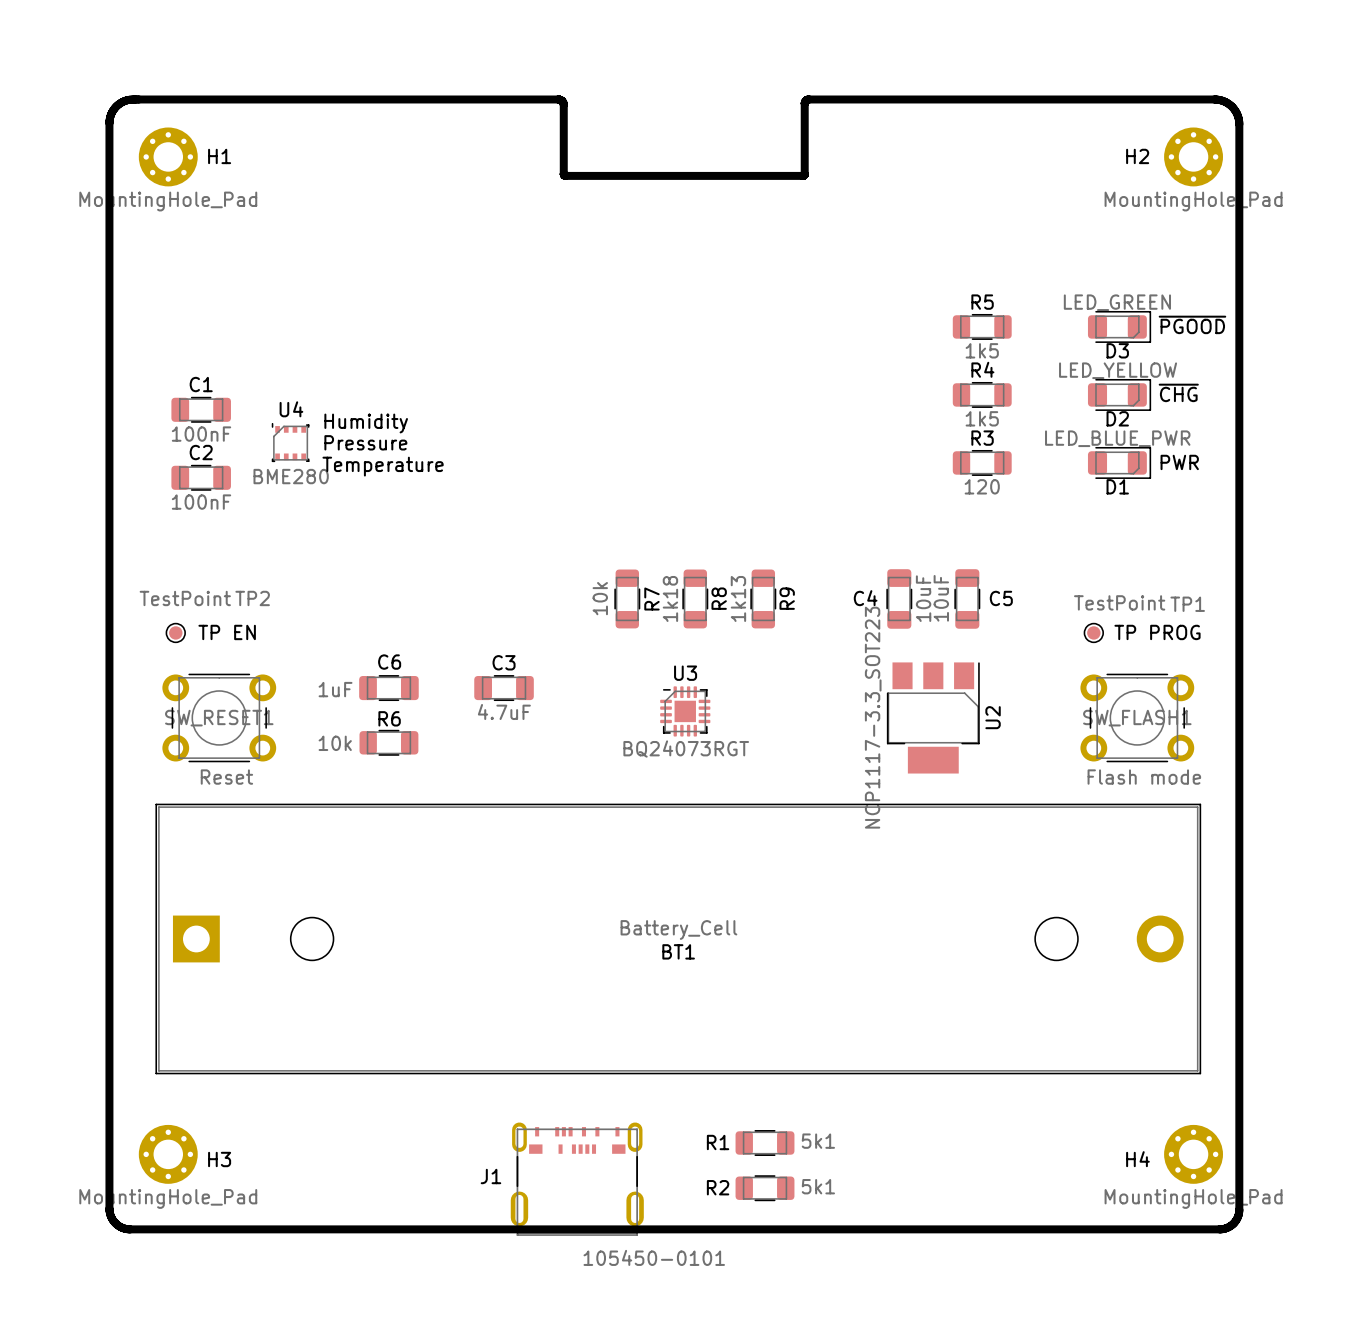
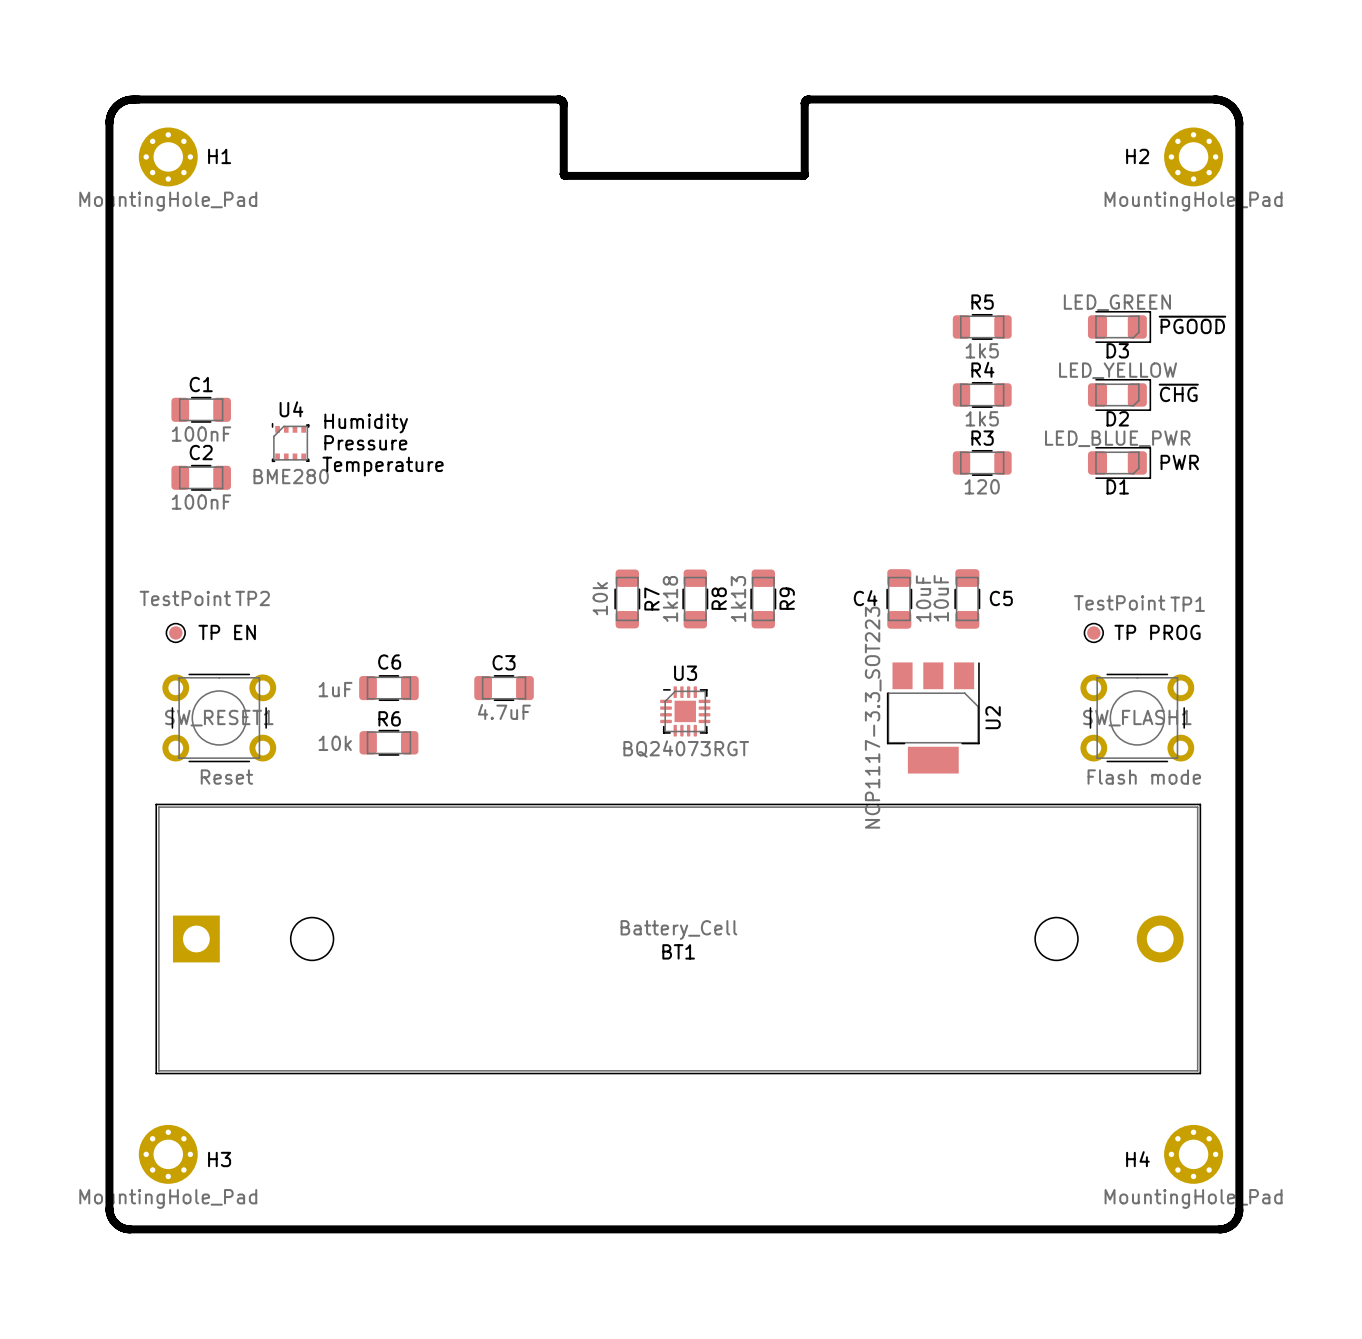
R1: 5k1 (764, 1142) -> none
J1: 105450-0101 (577, 1179) -> none
R2: 5k1 (764, 1188) -> none

